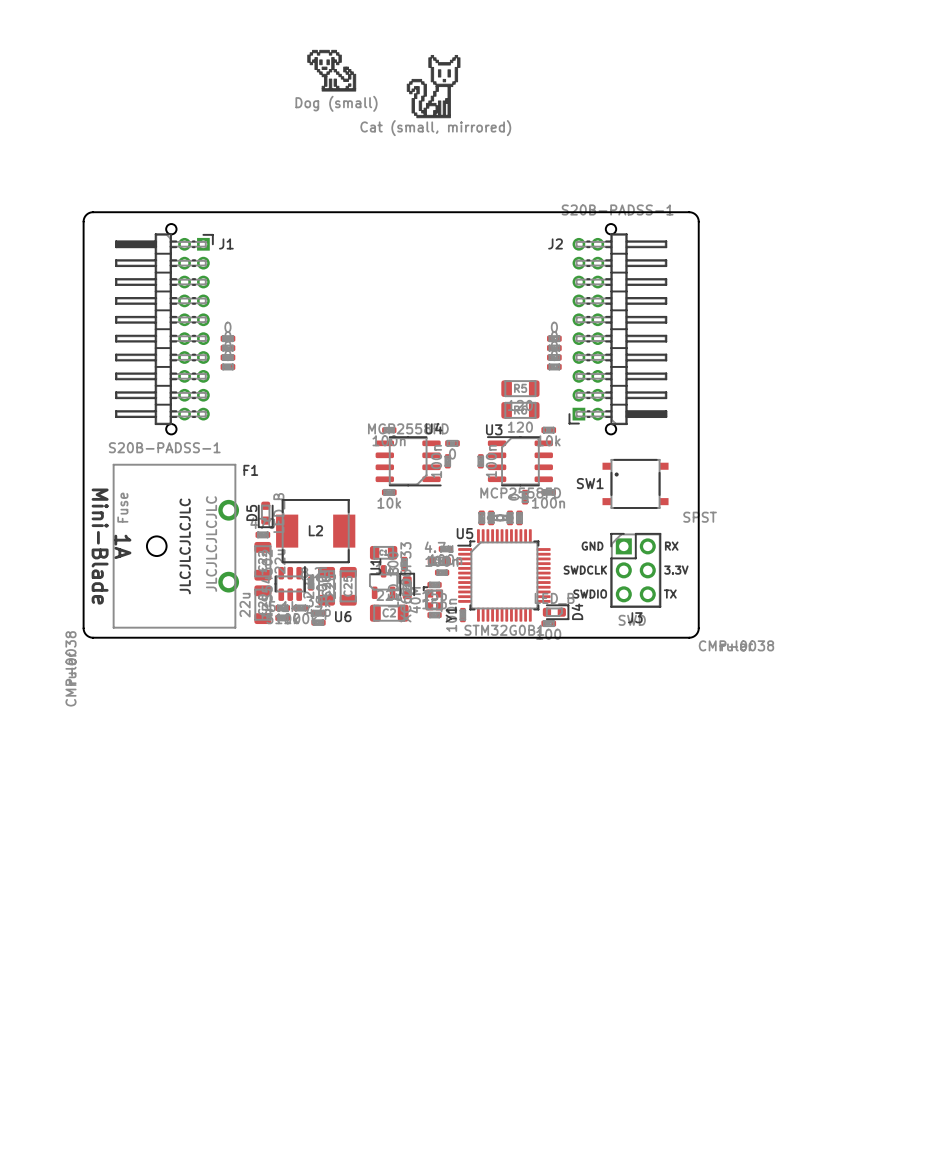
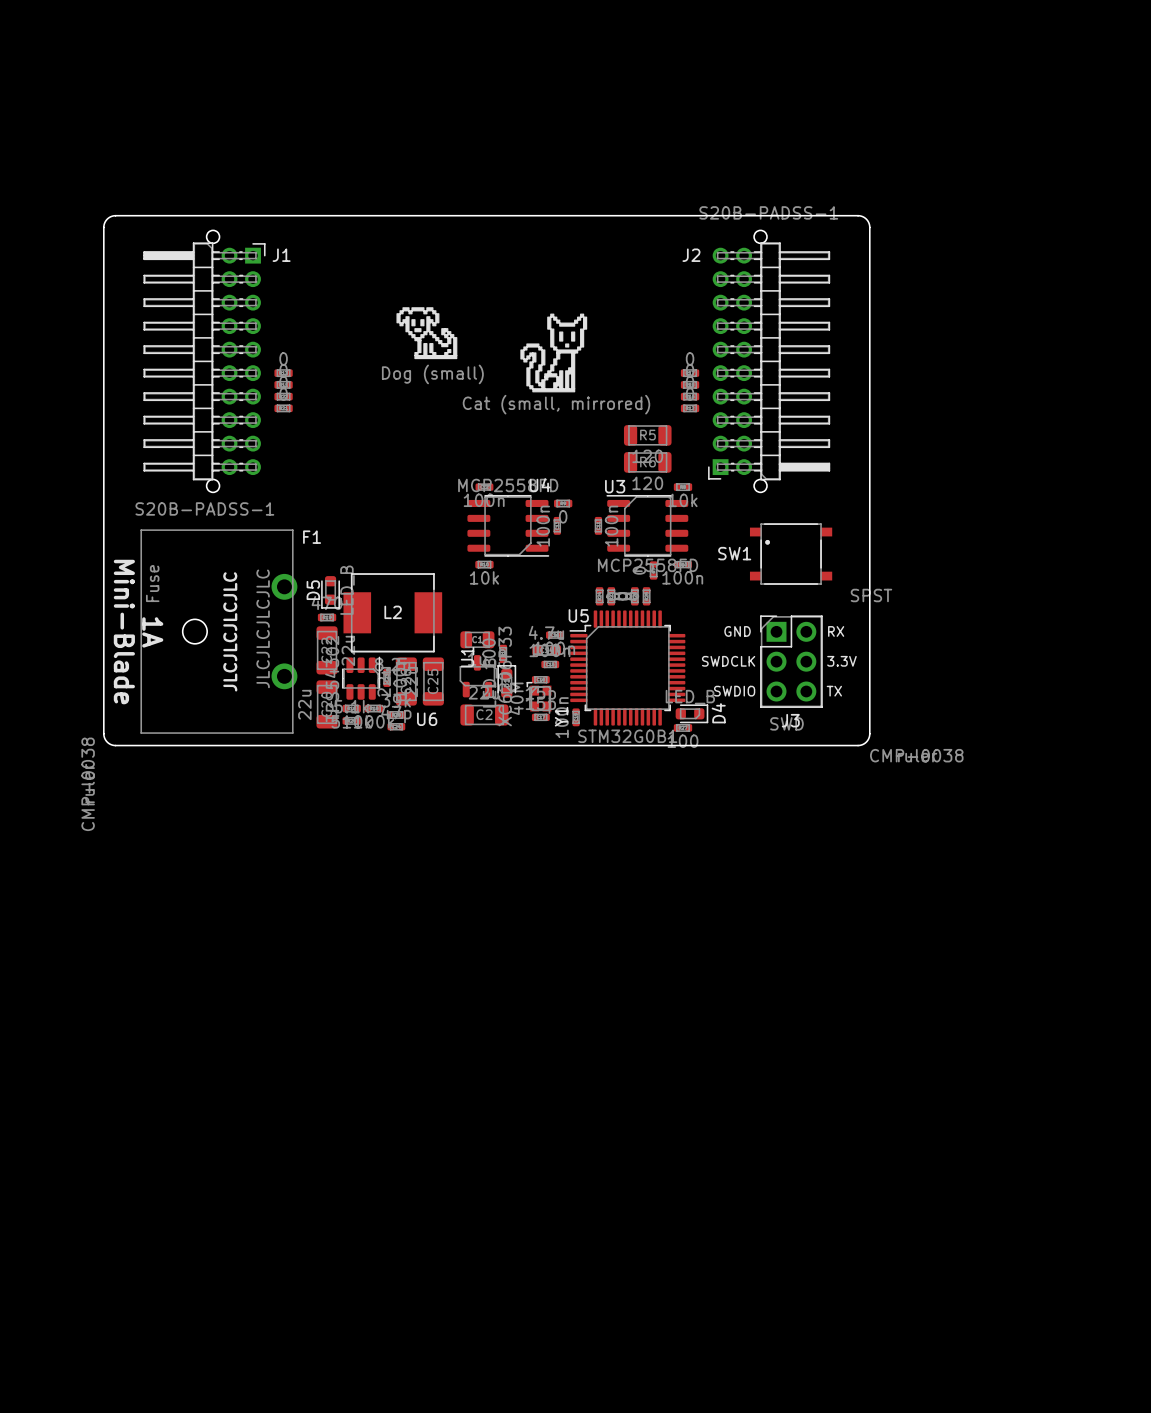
drawing: [307, 49, 461, 119] -> none
drawing: none -> [396, 307, 588, 393]

